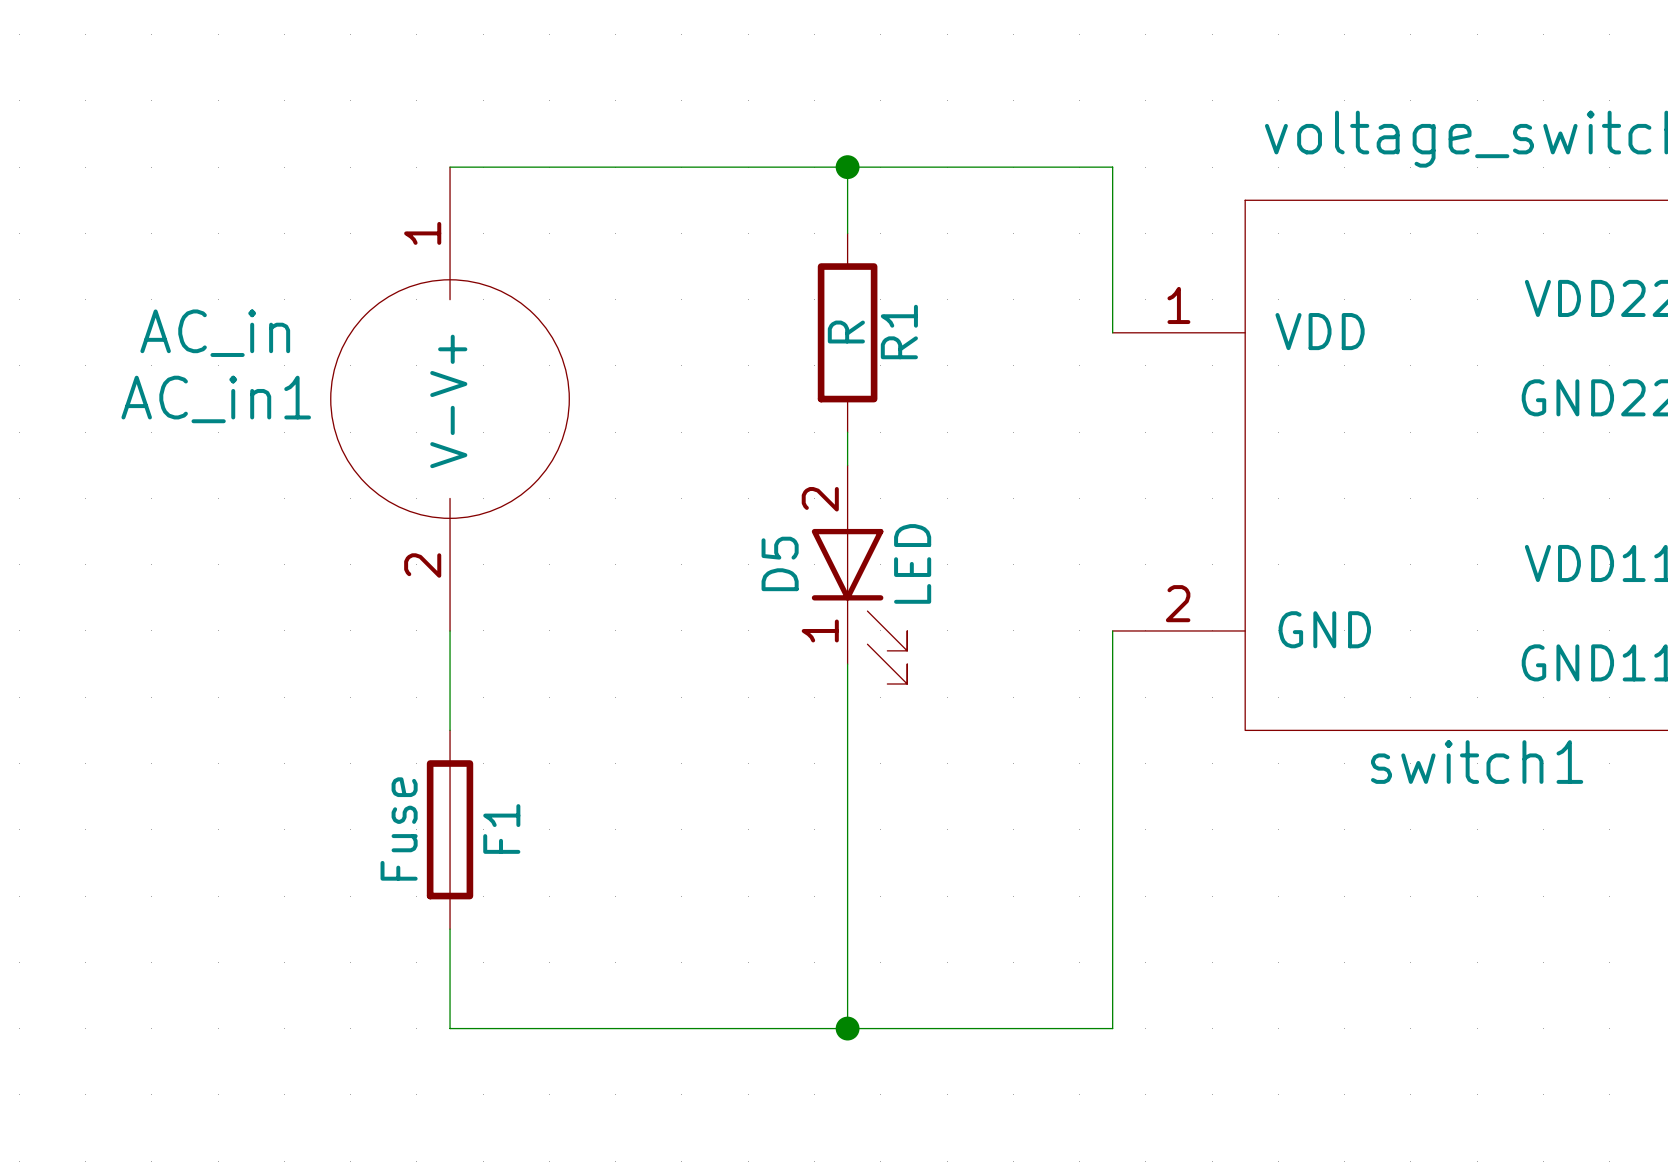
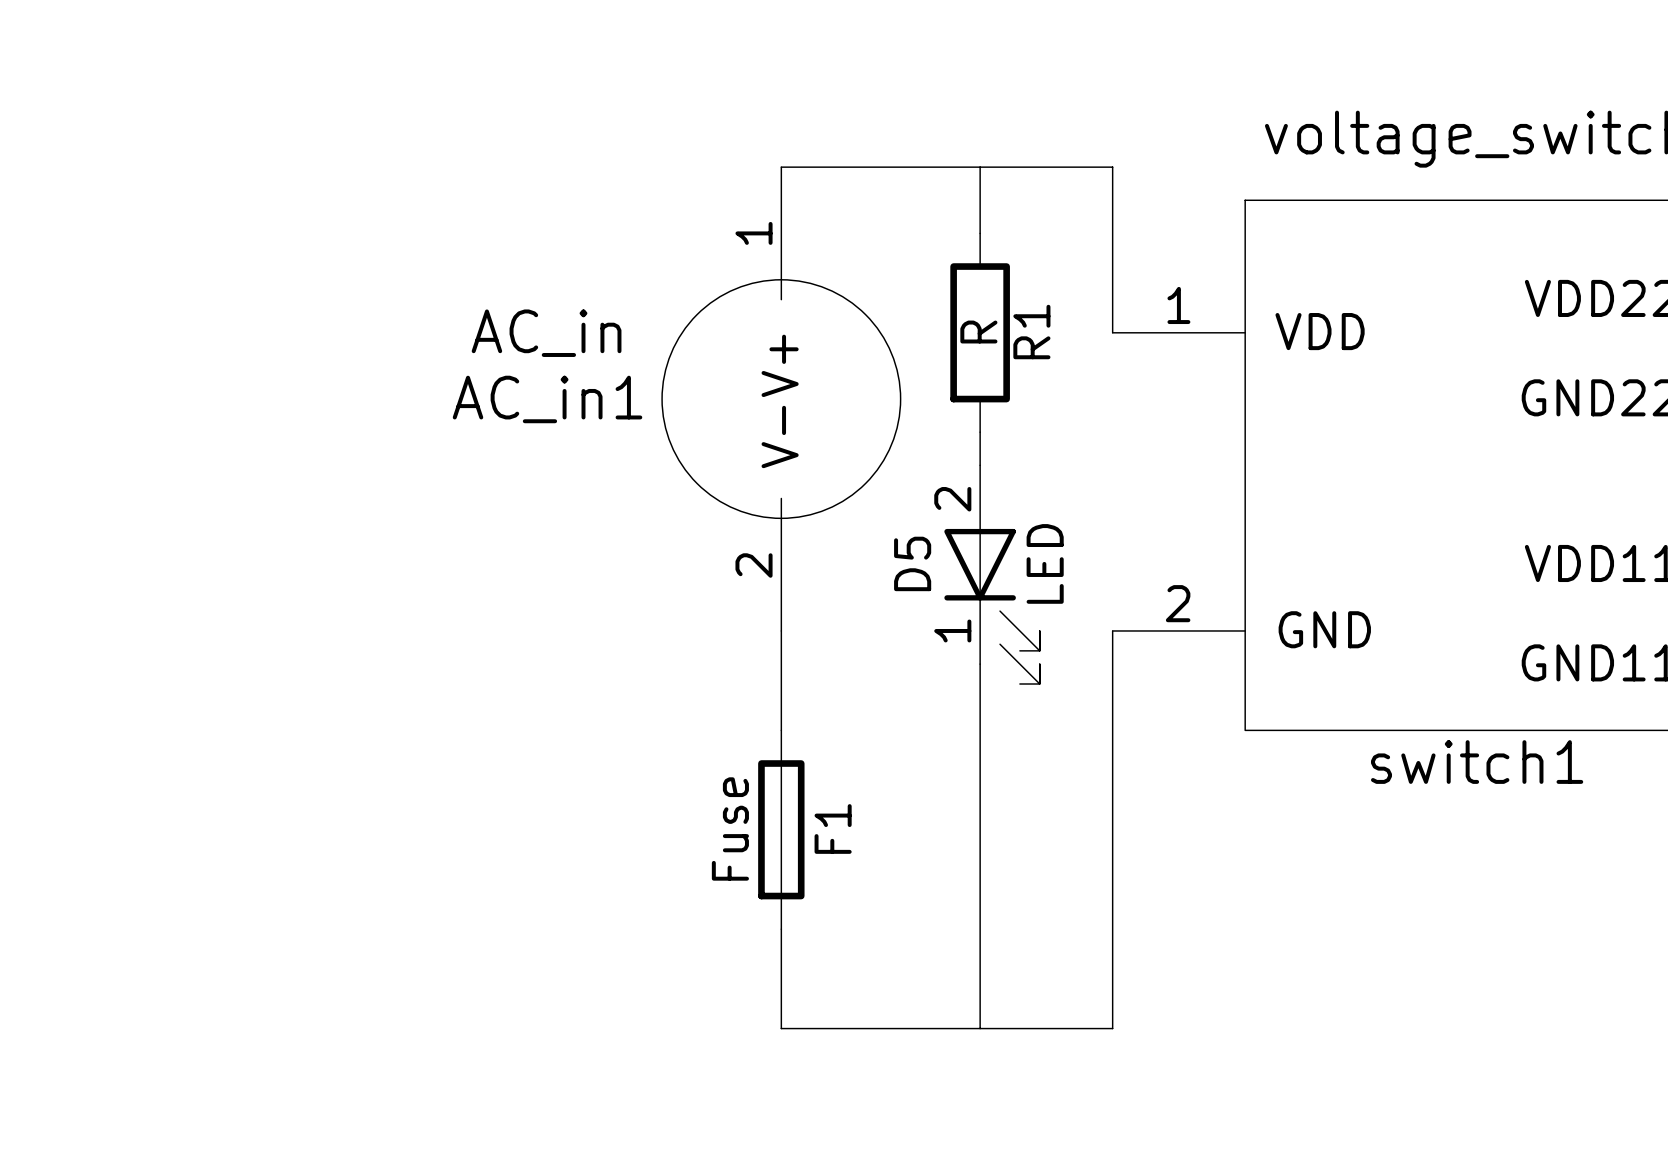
wire: (450, 167) (781, 167) -> none
wire: (847, 167) (847, 233) -> (980, 167) (980, 233)
junction: (847, 167) -> none
R1 position: (847, 332) -> (980, 332)
AC_in1 position: (450, 399) -> (781, 399)
wire: (847, 432) (847, 465) -> (980, 432) (980, 465)
D5 position: (859, 574) -> (992, 574)
wire: (450, 630) (450, 730) -> (781, 630) (781, 730)
wire: (847, 664) (847, 1028) -> (980, 664) (980, 1028)
F1 position: (450, 829) -> (781, 829)
wire: (450, 929) (450, 1028) (781, 1028) -> (781, 929) (781, 1028)
junction: (847, 1028) -> none

